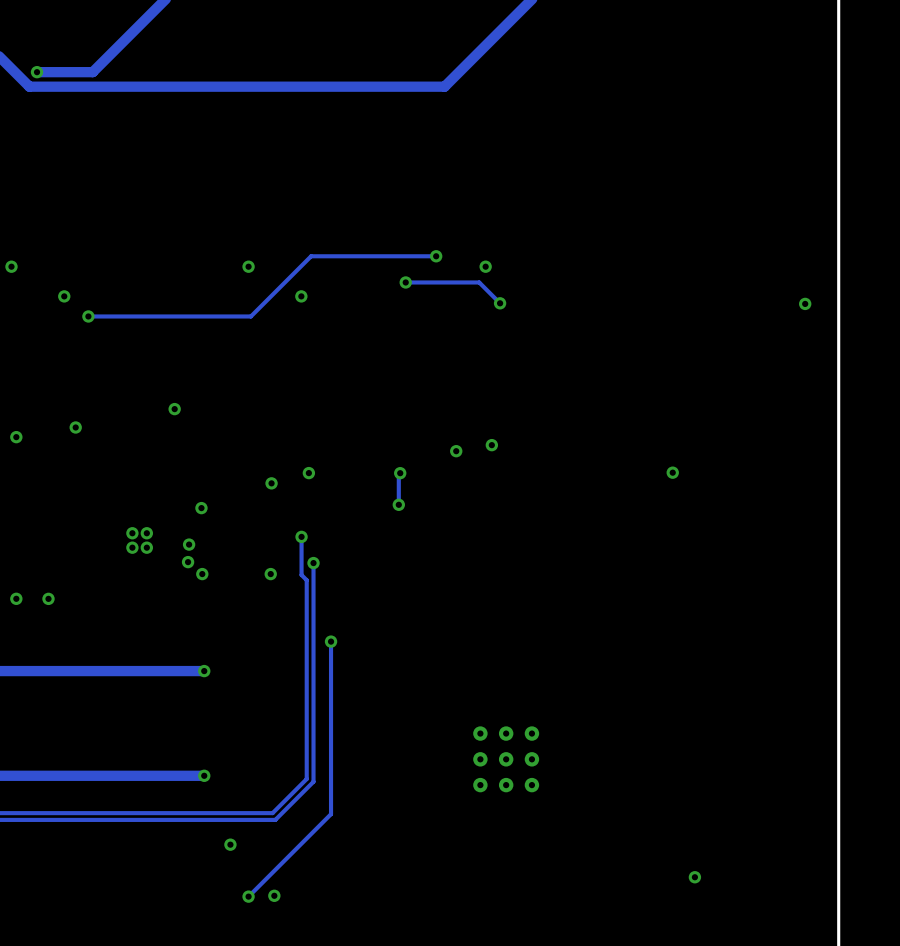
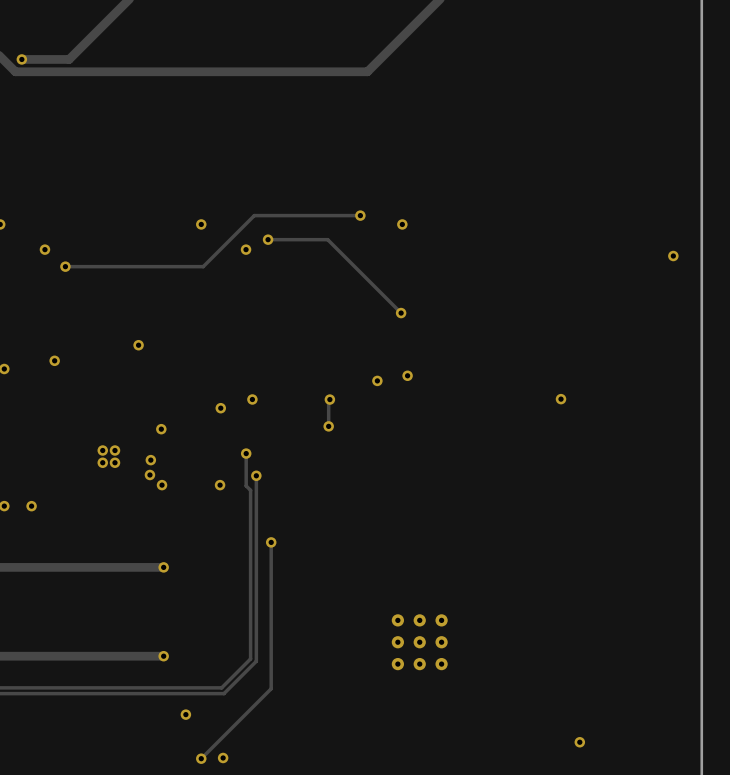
track: (405, 282) (479, 282) (500, 303) -> none
via: (405, 282) -> none
track: none -> (268, 239) (327, 239) (401, 313)
via: none -> (268, 239)
via: (500, 303) -> none
via: none -> (401, 313)

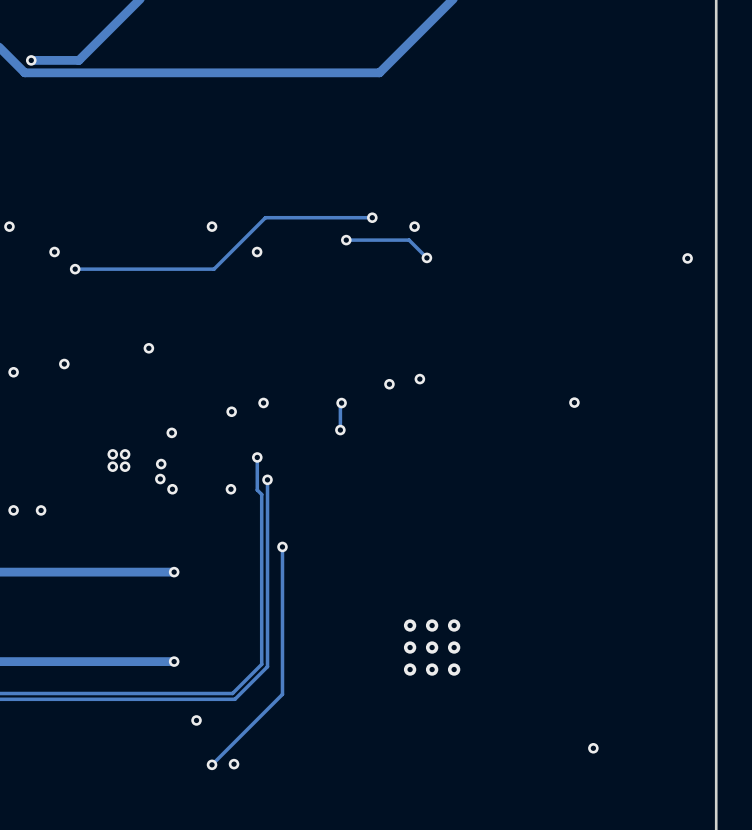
track: none -> (346, 240) (409, 240) (426, 257)
via: none -> (346, 240)
track: (268, 239) (327, 239) (401, 313) -> none
via: (268, 239) -> none
via: none -> (426, 257)
via: (401, 313) -> none

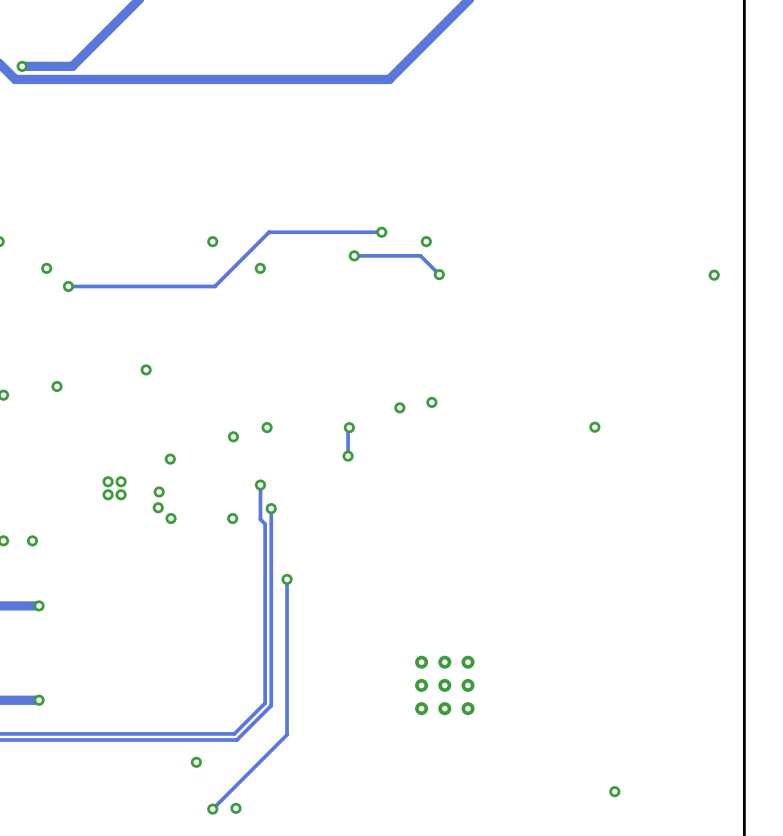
via: none -> (39, 605)
track: (174, 572) (47, 572) -> none
via: (174, 572) -> none
via: none -> (39, 700)
track: (174, 661) (47, 661) -> none
via: (174, 661) -> none

